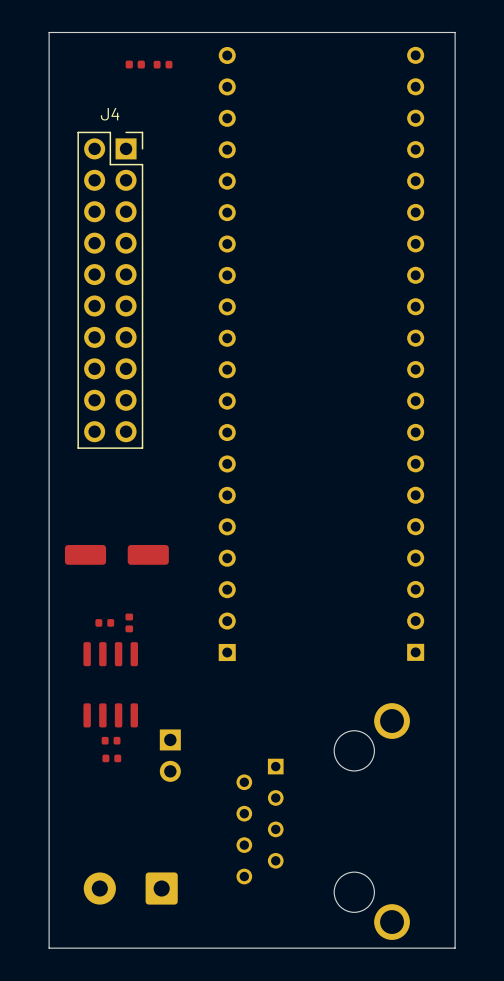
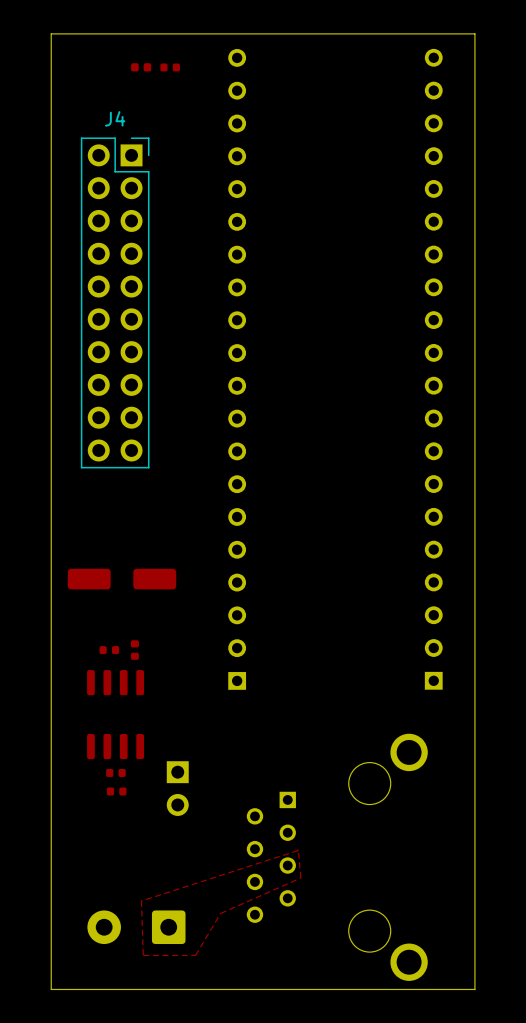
top zone outline: none -> (298, 849) (300, 877) (220, 913) (195, 955) (143, 955) (141, 900) (298, 849)

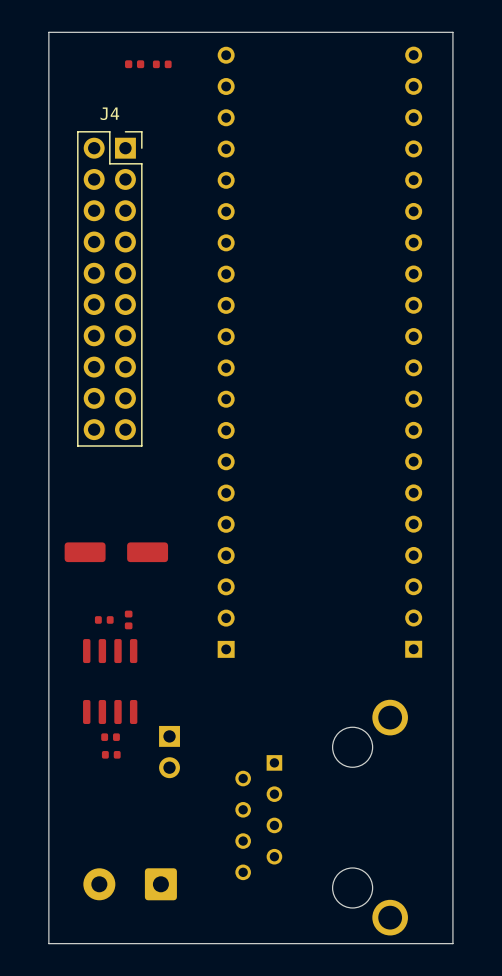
top zone outline: (298, 849) (300, 877) (220, 913) (195, 955) (143, 955) (141, 900) (298, 849) -> none

